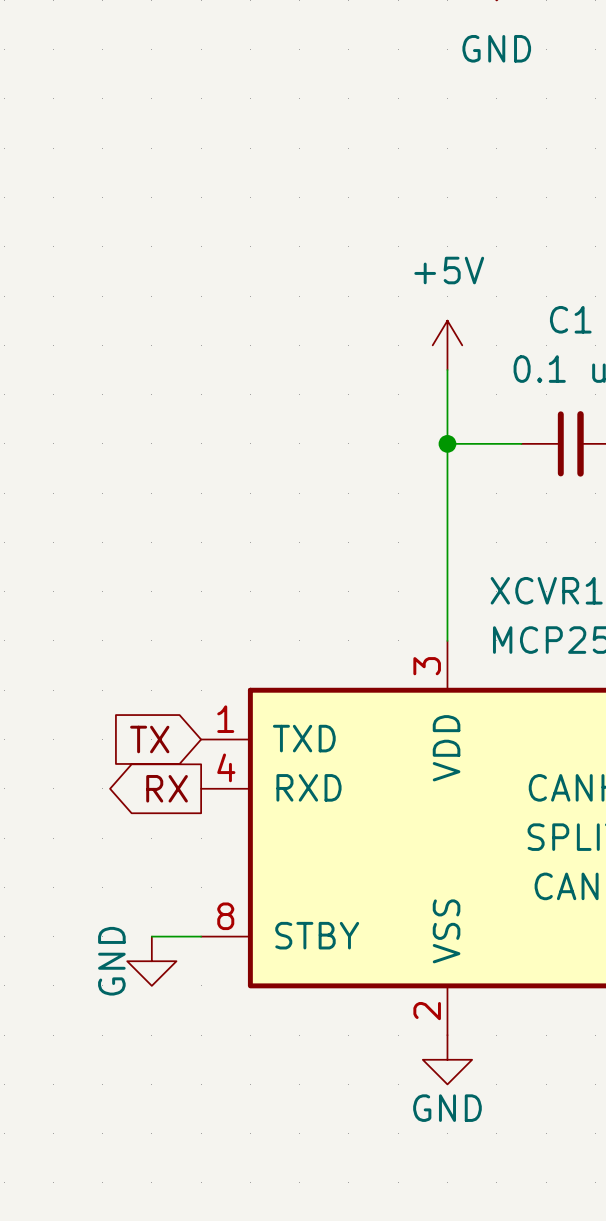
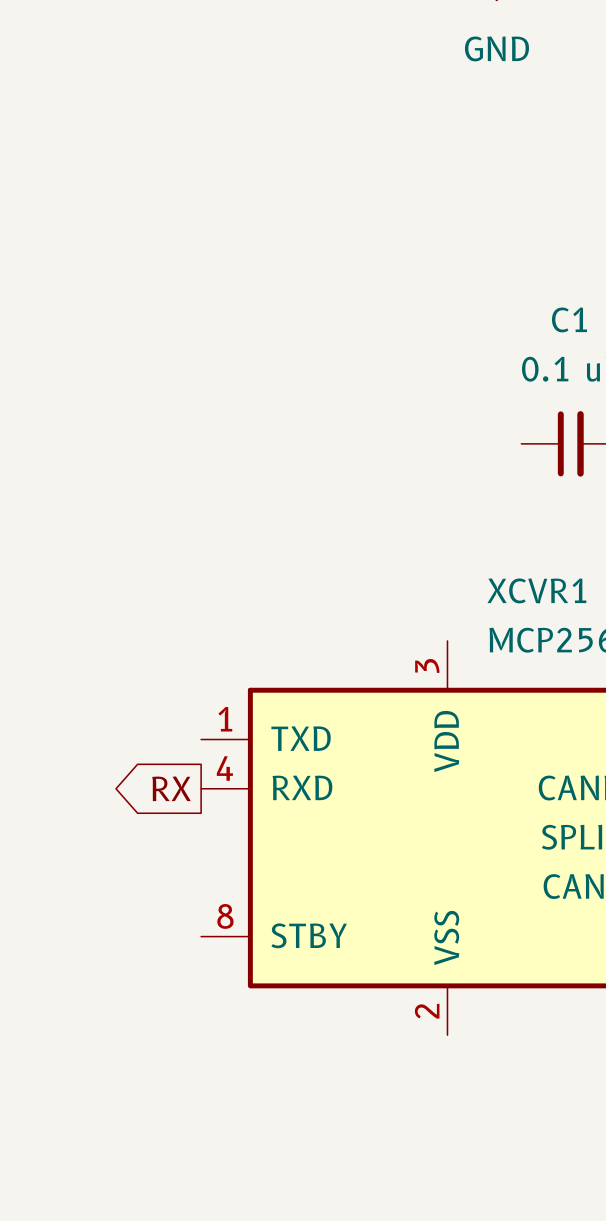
power symbol: +5V (447, 345) -> none
wire: (447, 369) (447, 640) -> none
wire: (447, 443) (521, 443) -> none
junction: (447, 443) -> none
global label: TX (149, 739) -> none
wire: (151, 936) (201, 936) -> none
power symbol: GND (151, 961) -> none
power symbol: GND (447, 1059) -> none

